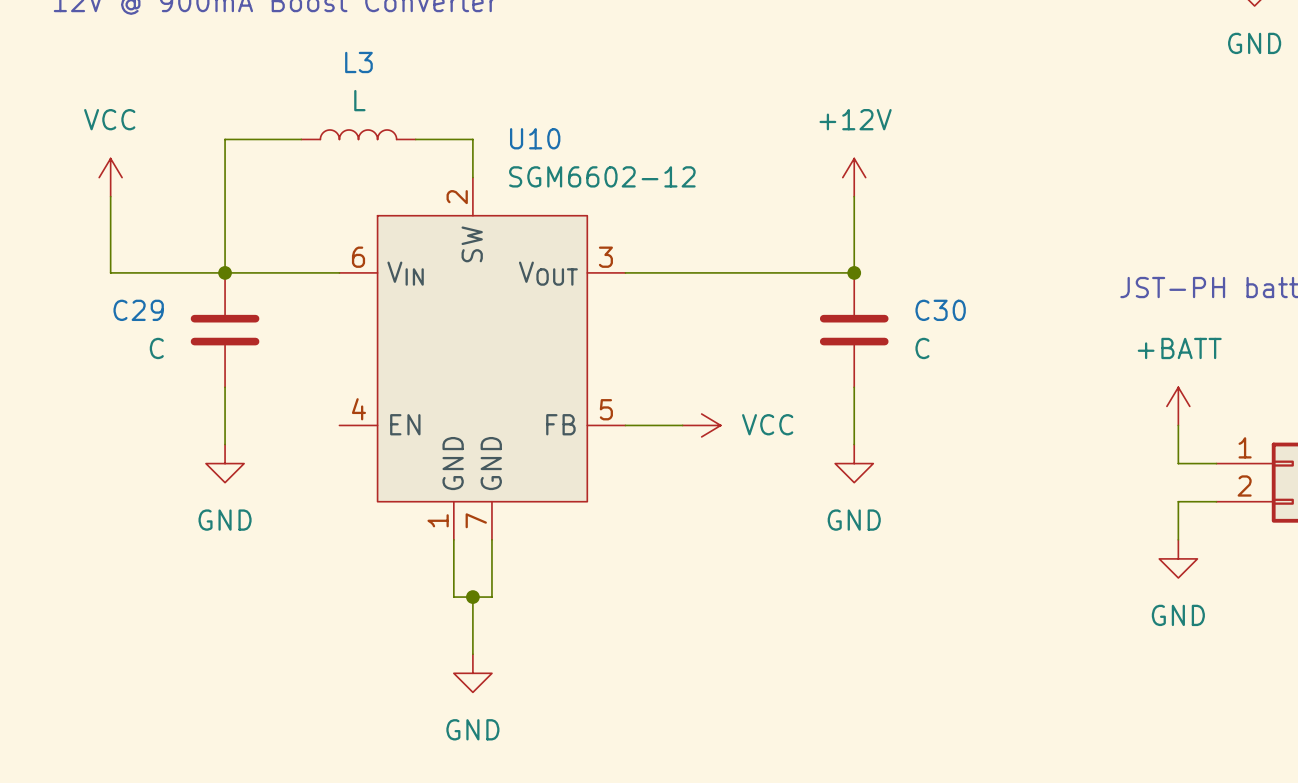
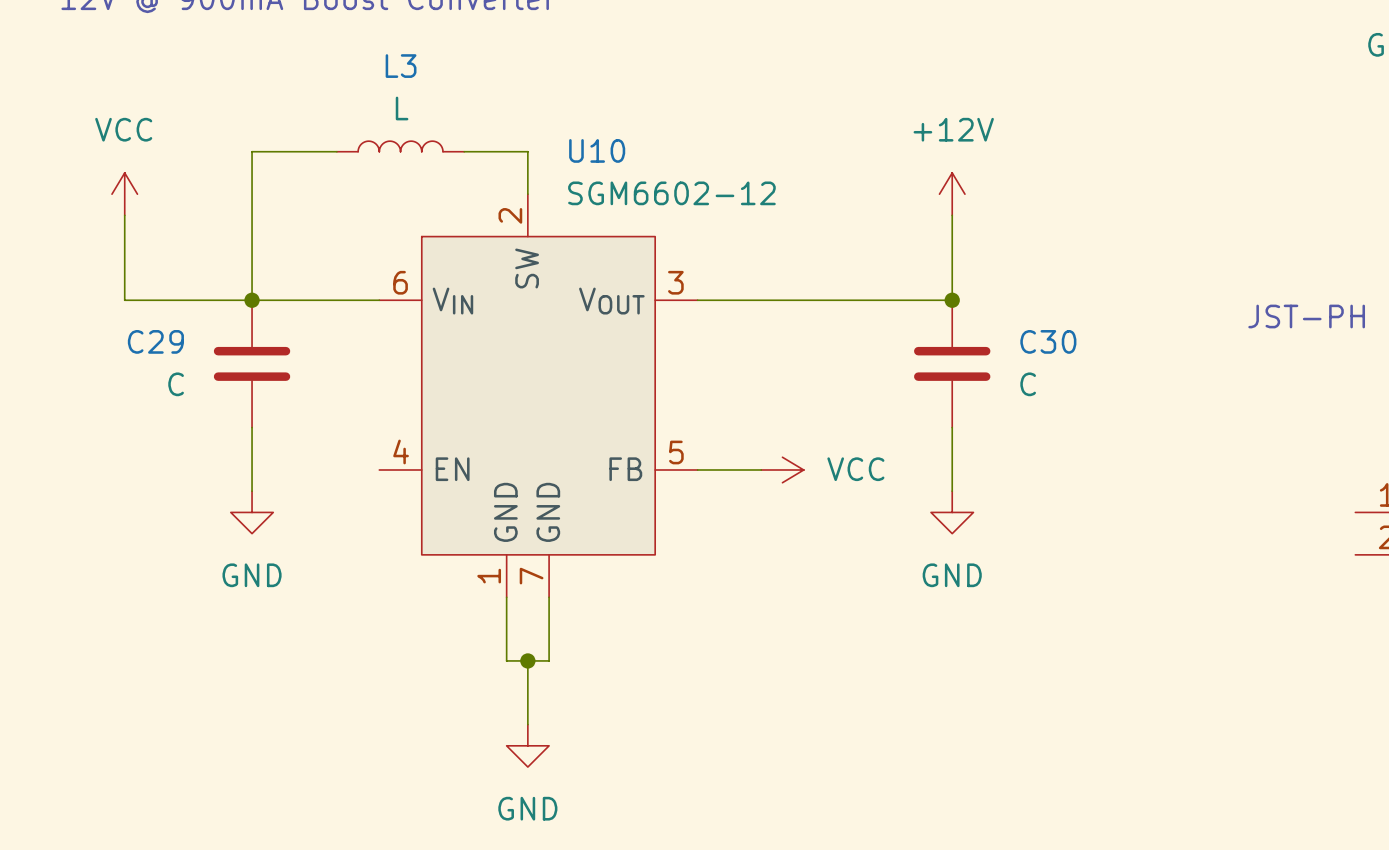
power symbol: +BATT (1178, 406) -> none
wire: (1178, 425) (1178, 463) (1216, 463) -> none
wire: (1216, 501) (1178, 501) (1178, 539) -> none
power symbol: GND (1178, 558) -> none

